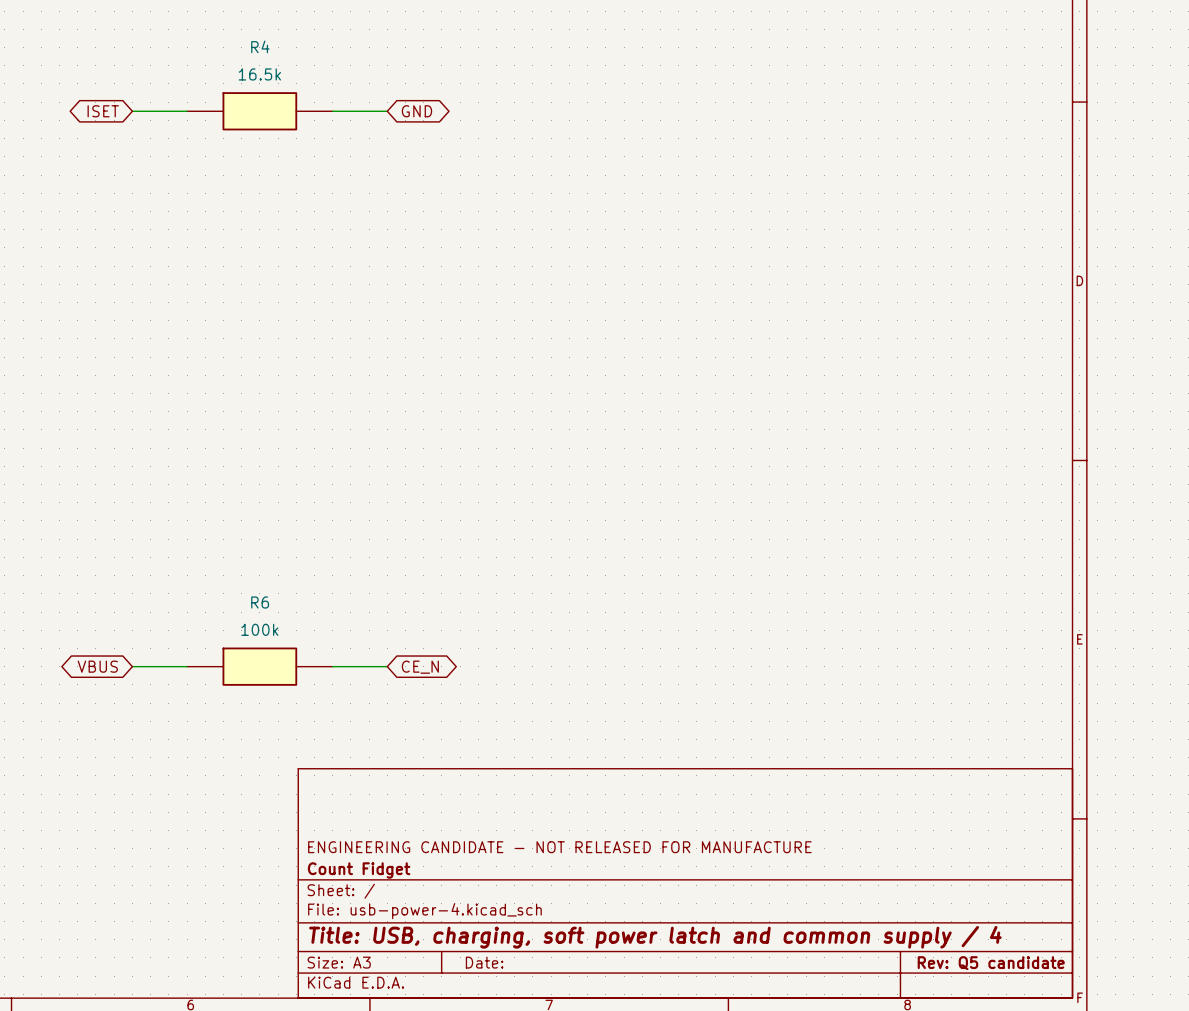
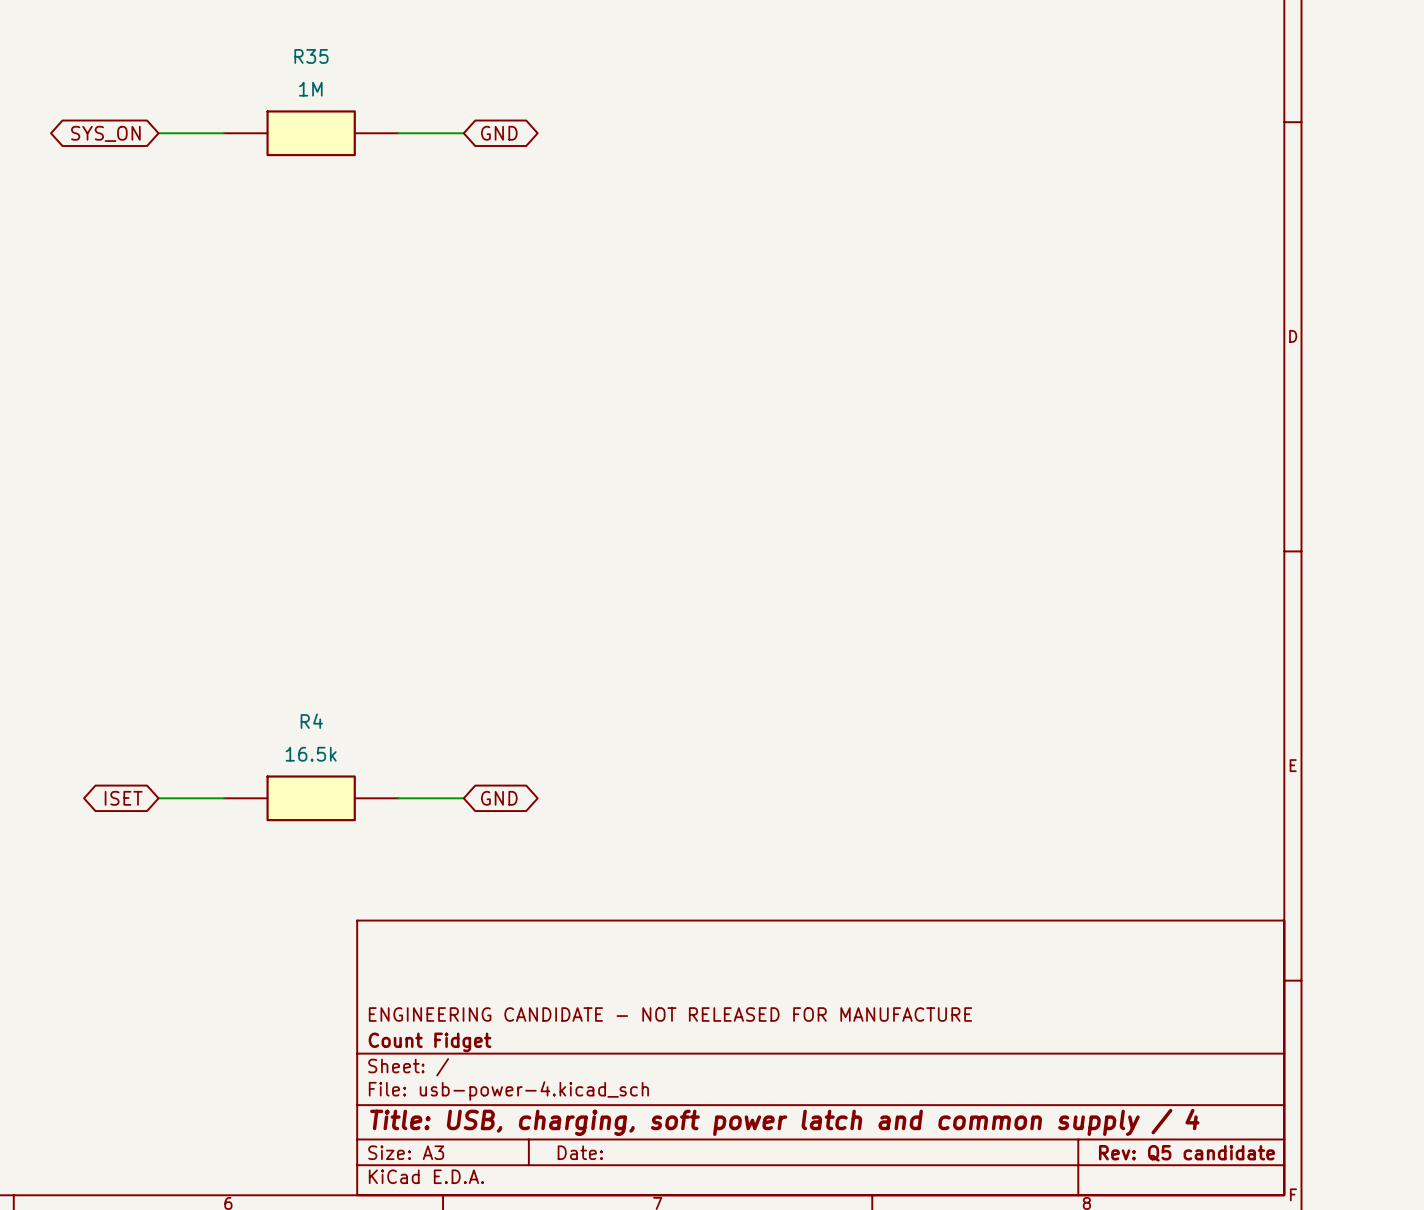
R4 name: R4 (260, 46) -> R35 (311, 56)
R4 value: 16.5k (259, 74) -> 1M (310, 89)
global label: ISET (103, 111) -> SYS_ON (105, 133)
R6 name: R6 (260, 602) -> R4 (311, 721)
R6 value: 100k (259, 629) -> 16.5k (311, 754)
global label: VBUS (97, 666) -> ISET (123, 798)
global label: CE_N (420, 667) -> GND (499, 798)

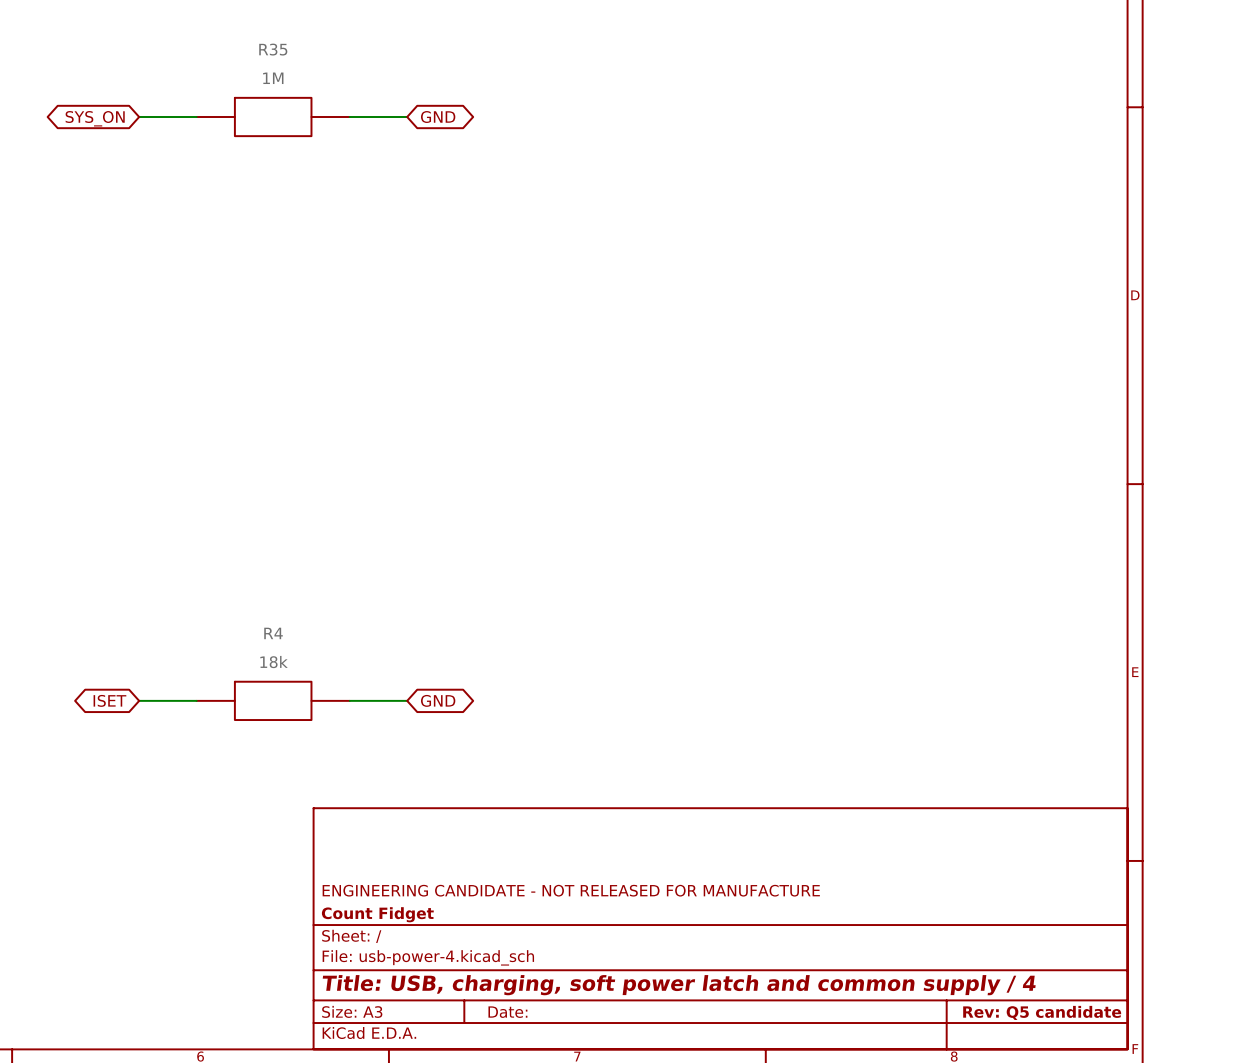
R4 value: 16.5k (311, 754) -> 18k (274, 662)

